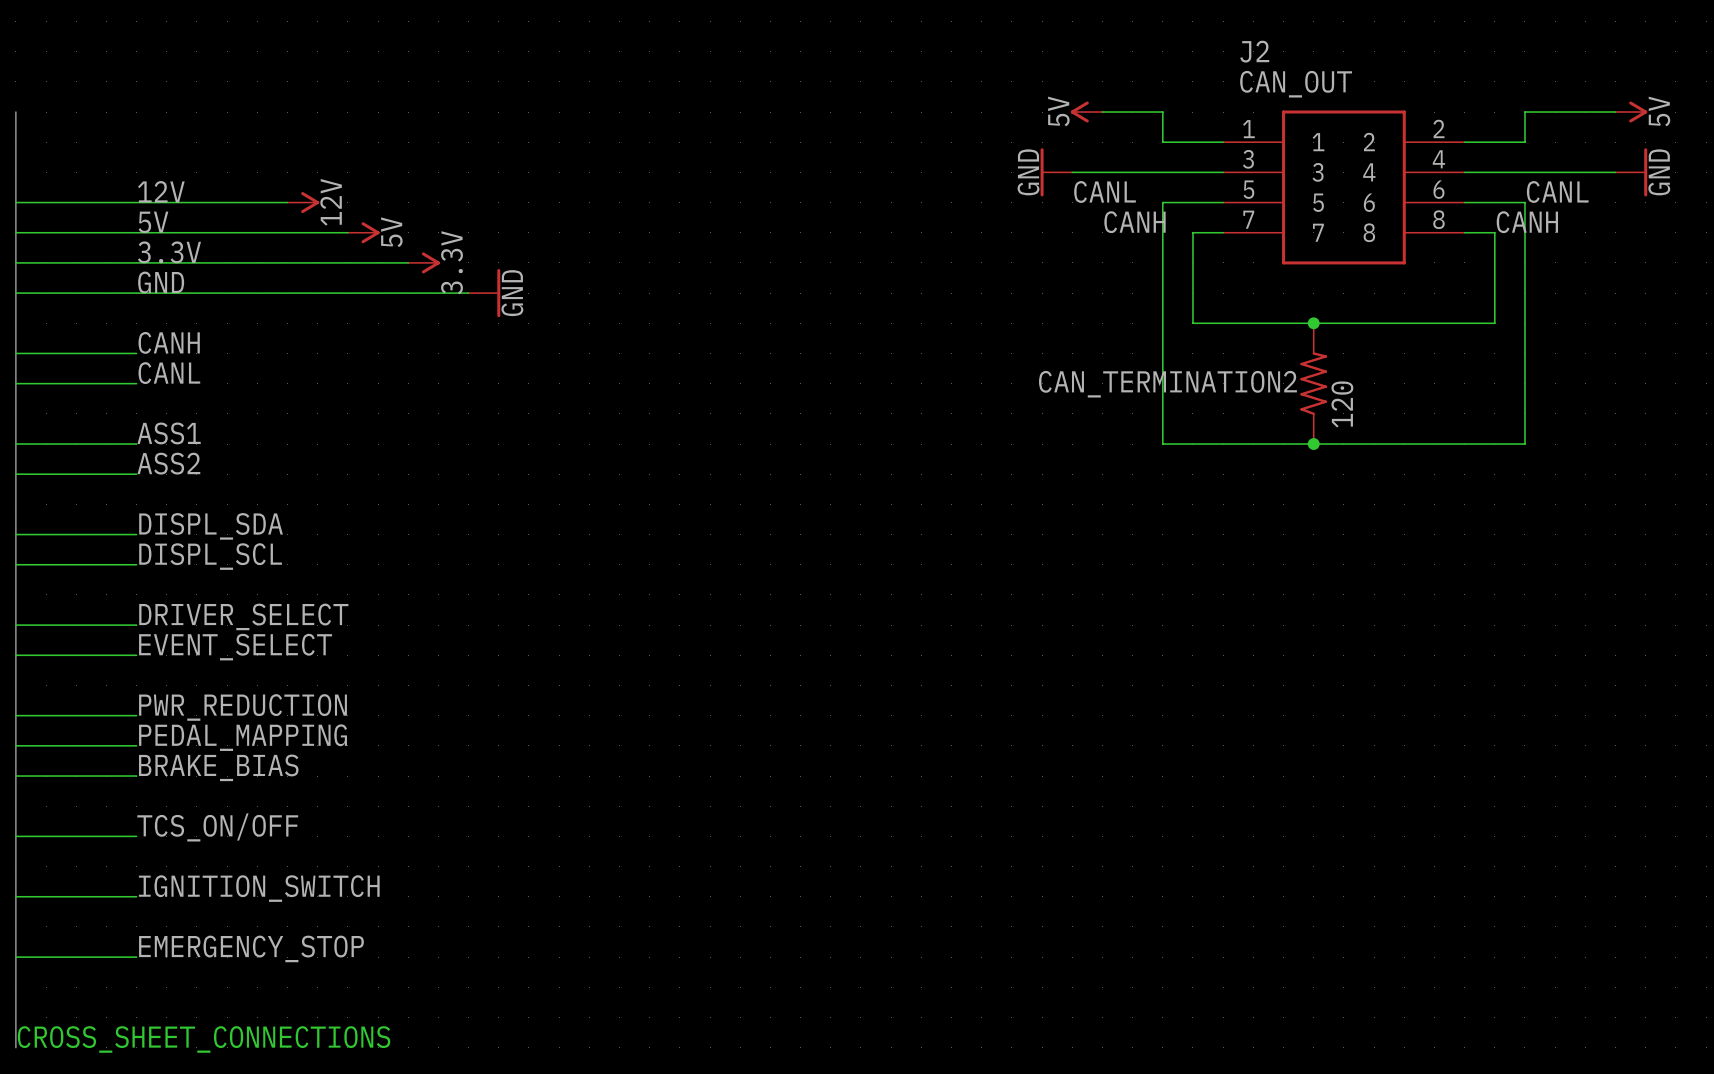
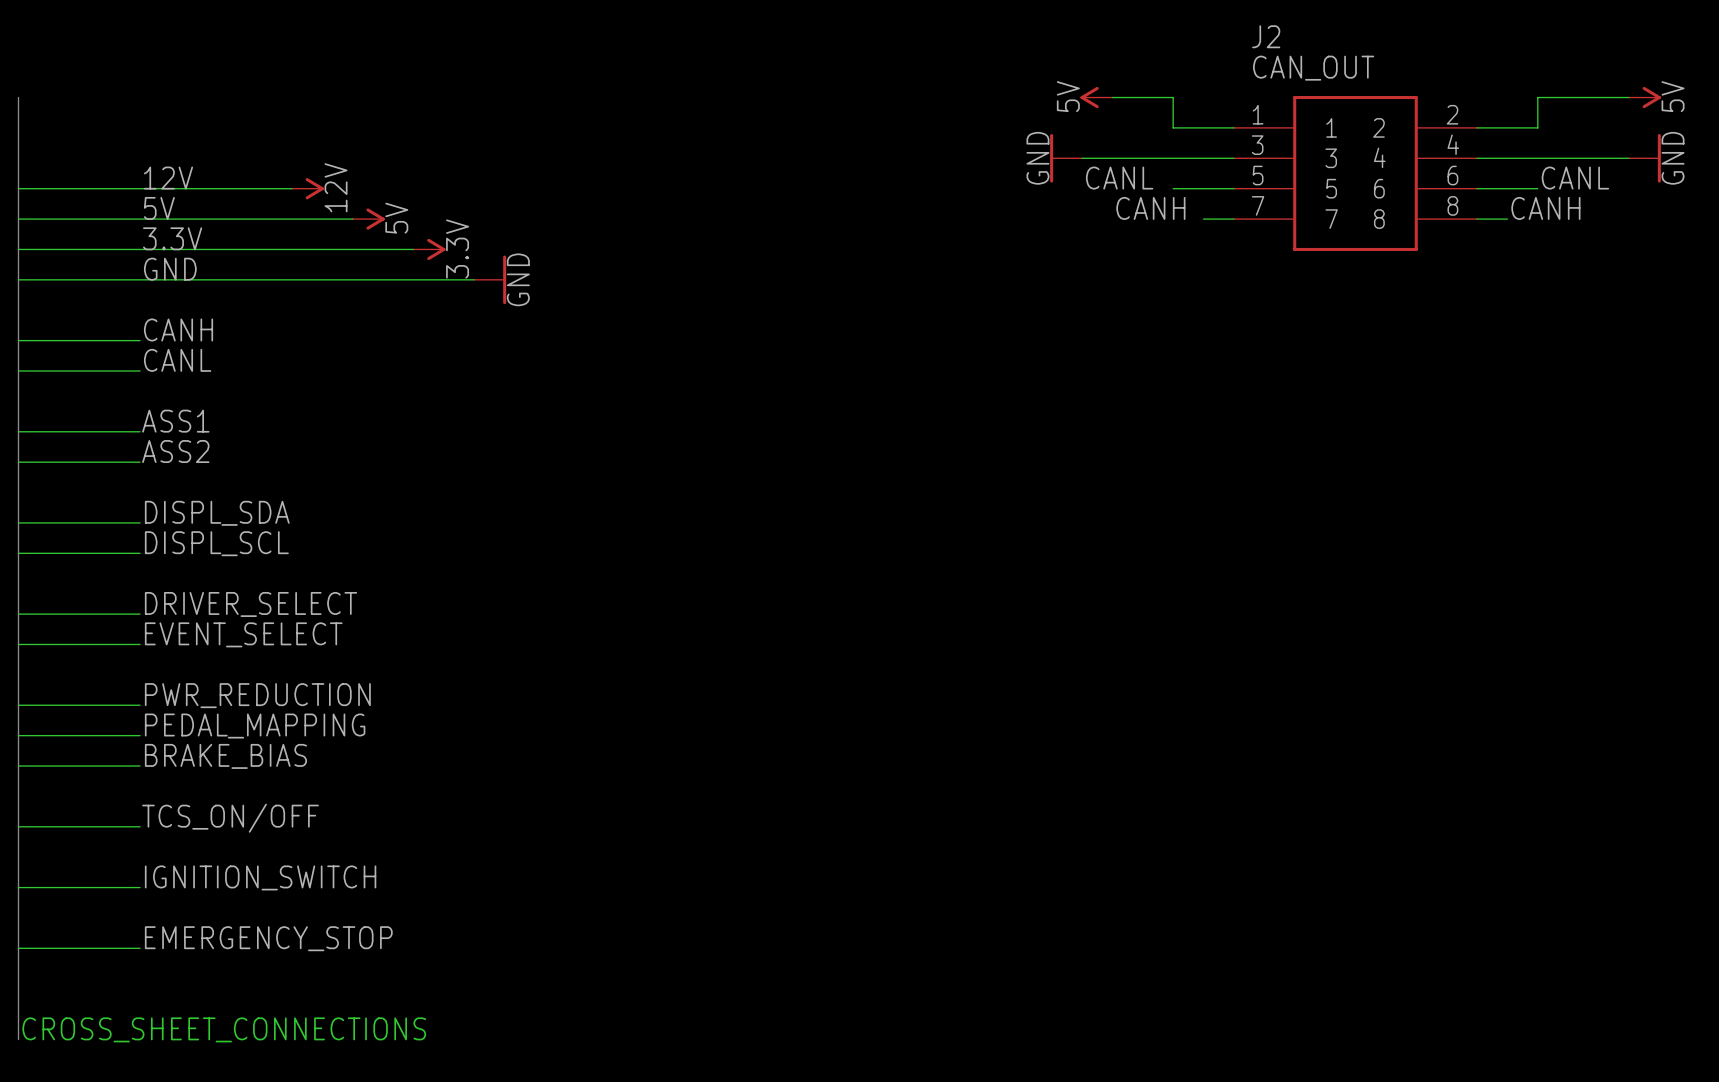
wire: (1162, 202) (1162, 444) (1524, 444) (1524, 202) -> none
wire: (1192, 232) (1192, 323) (1494, 323) (1494, 232) -> none
junction: (1313, 323) -> none
CAN_TERMINATION2: 120 (1313, 383) -> none
junction: (1313, 444) -> none

